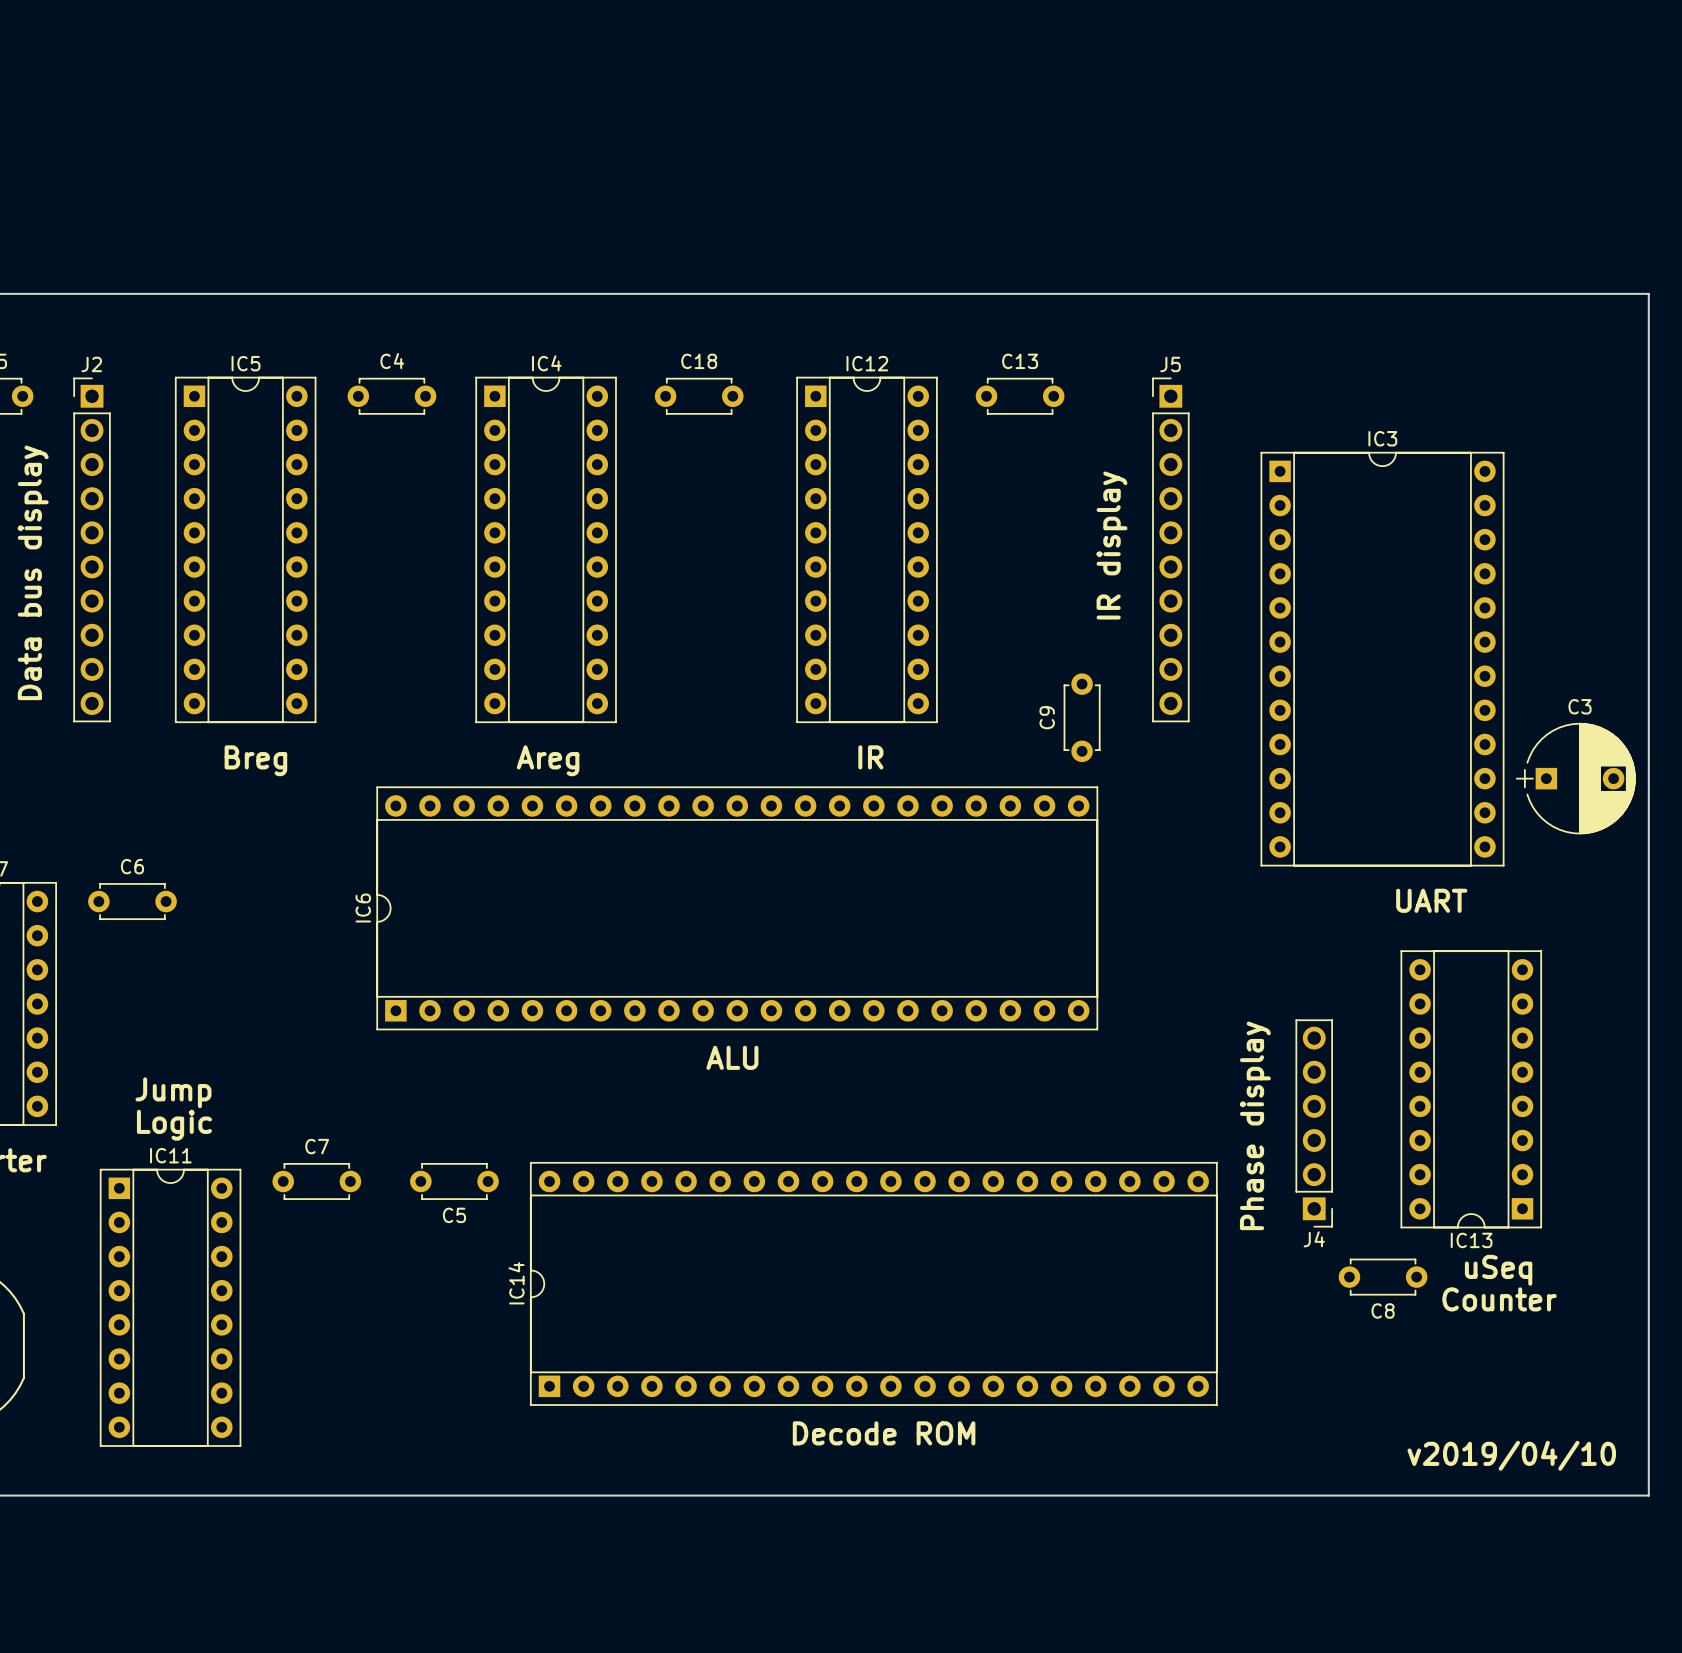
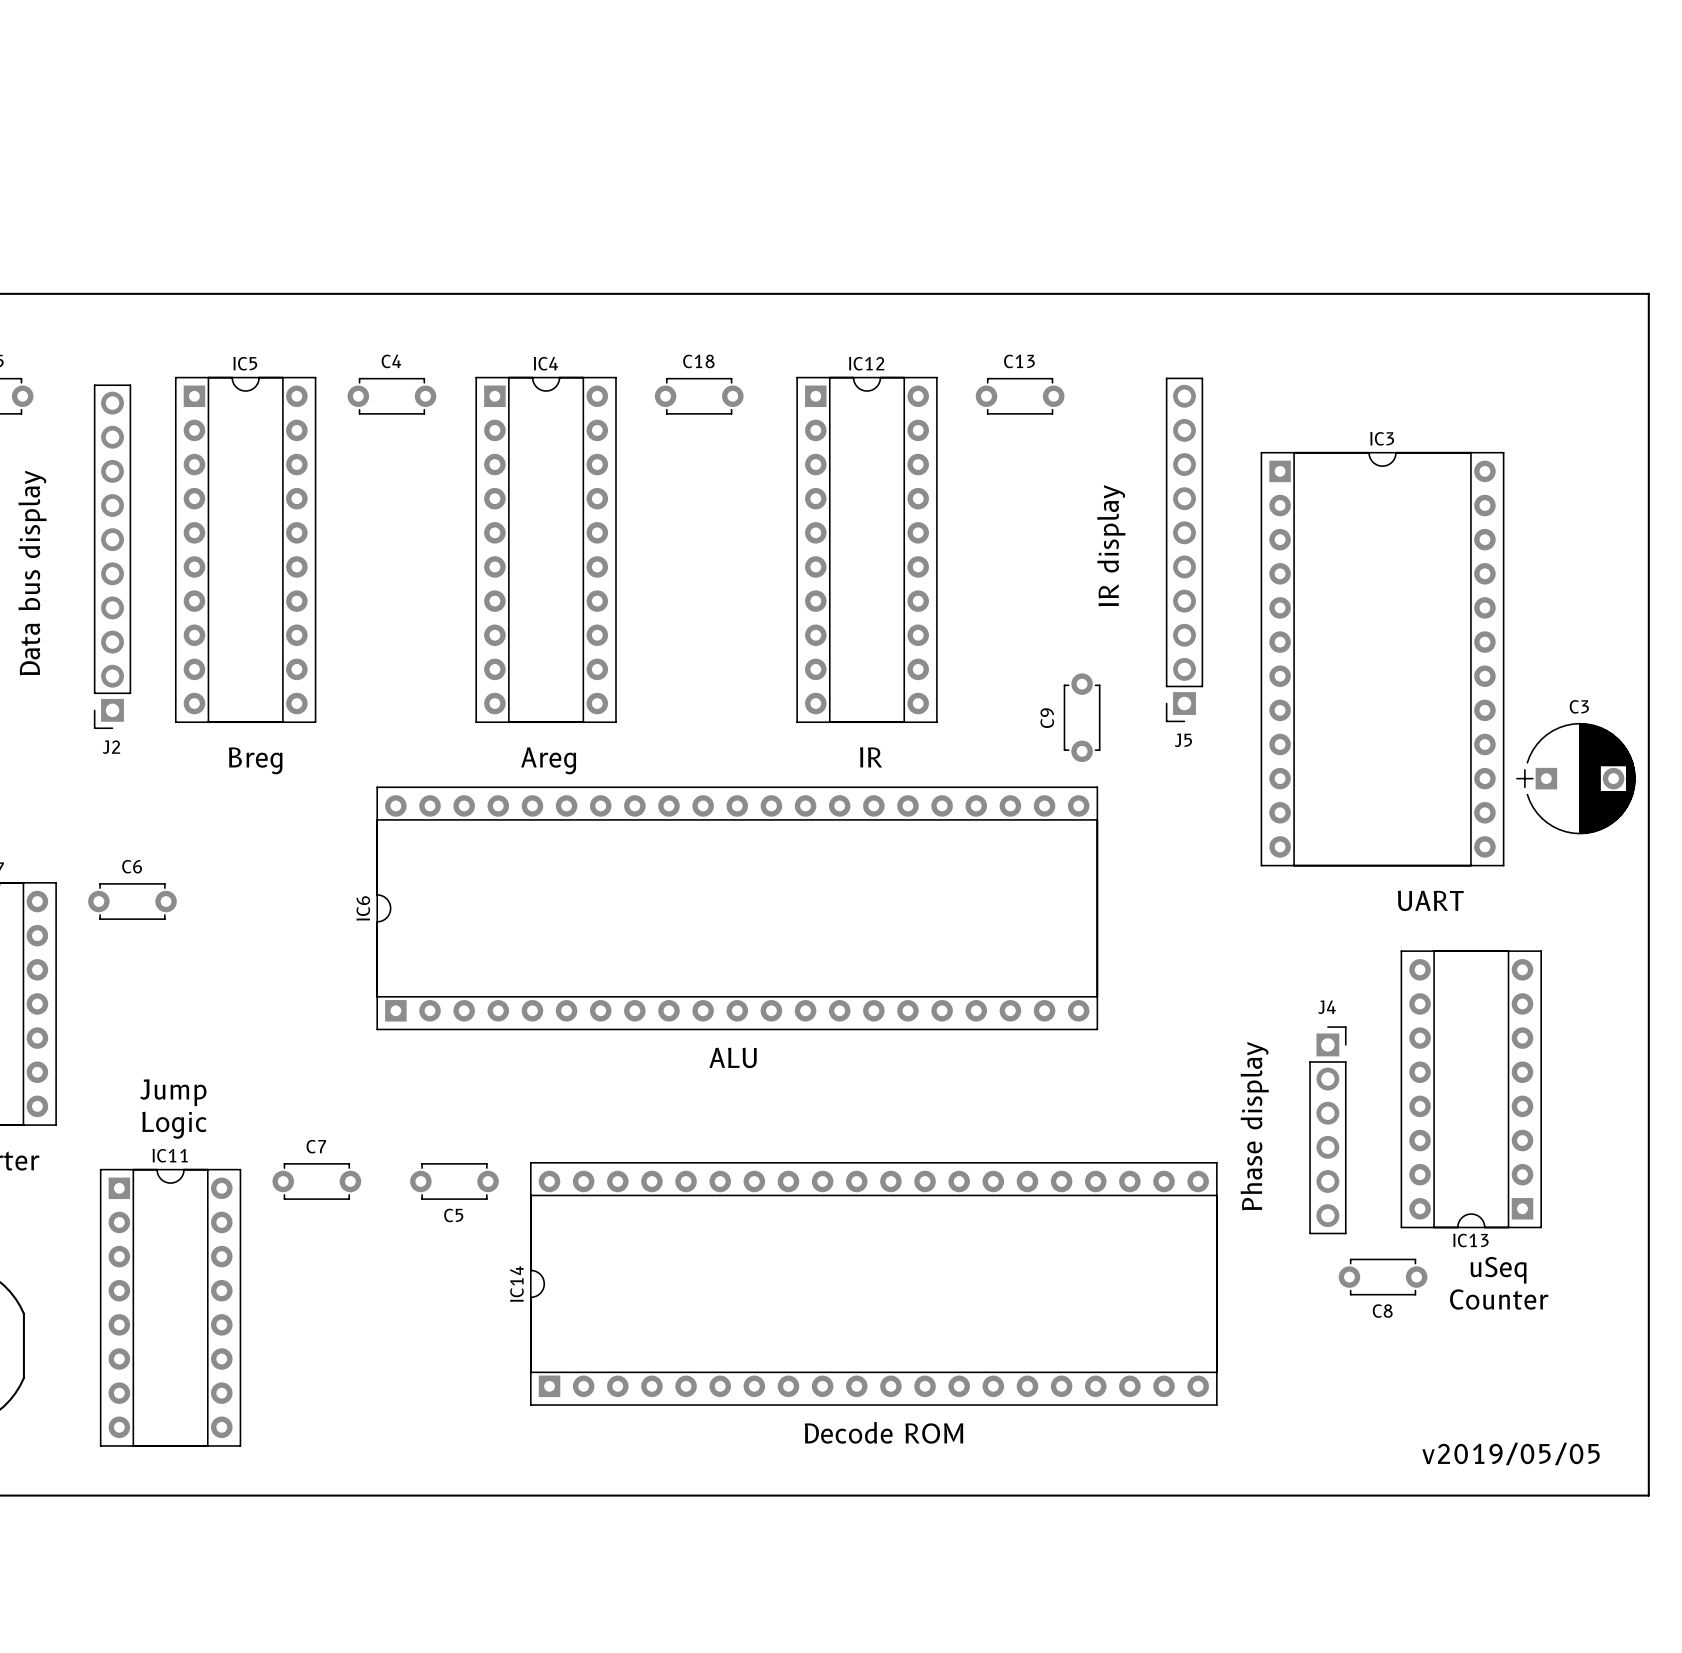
J2 name position: J2 (91, 364) -> J2 (111, 747)
J5 name position: J5 (1170, 364) -> J5 (1183, 740)
J2 footprint: [73, 377, 111, 723] -> [93, 384, 132, 730]
J5 footprint: [1152, 377, 1190, 723] -> [1165, 377, 1204, 723]
J4 footprint: [1295, 1019, 1333, 1228] -> [1309, 1026, 1347, 1235]
J4 name position: J4 (1314, 1239) -> J4 (1327, 1007)
text: v2019/04/10 (1511, 1455) -> v2019/05/05 (1511, 1453)

